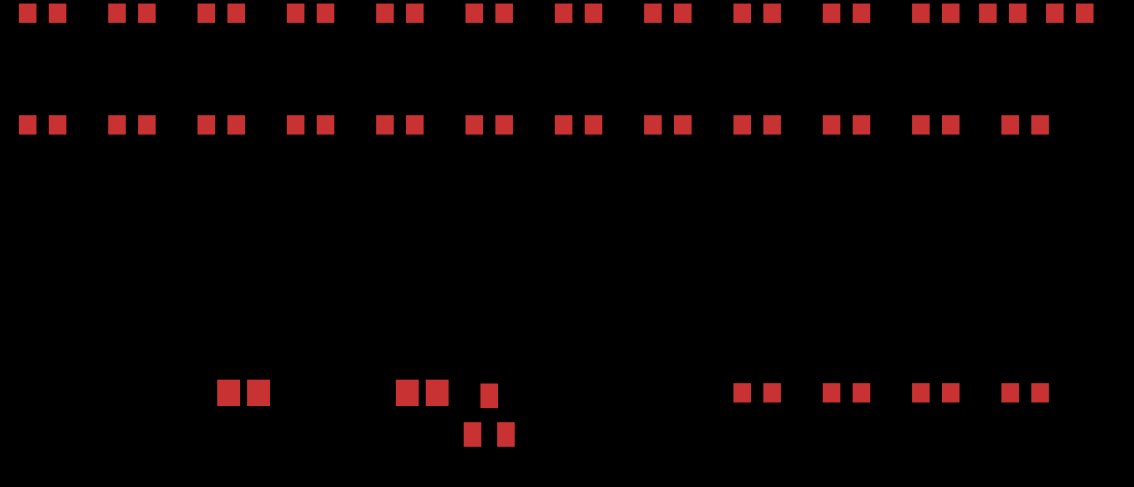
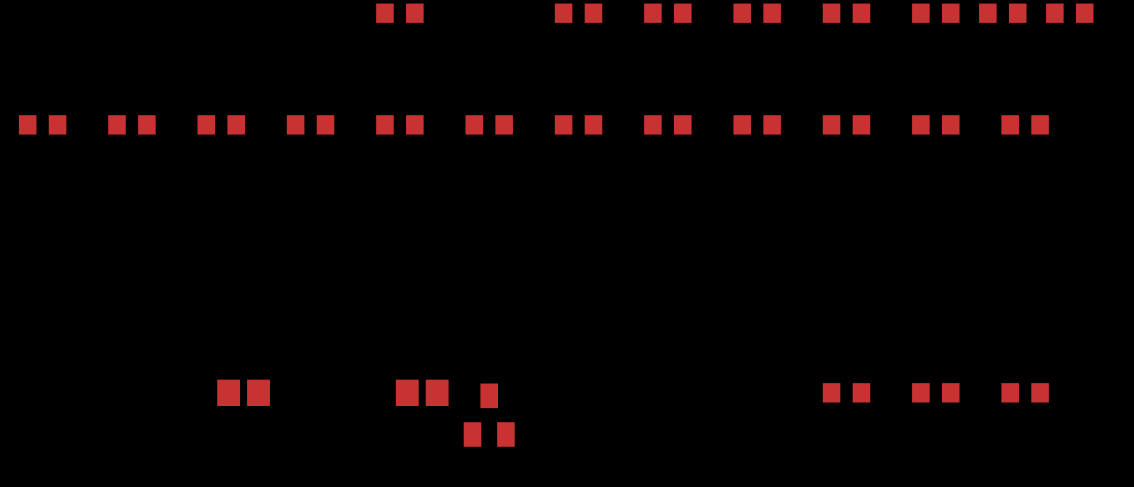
part: (42, 13) -> none
part: (131, 13) -> none
part: (221, 13) -> none
part: (310, 13) -> none
part: (489, 13) -> none
part: (757, 392) -> none

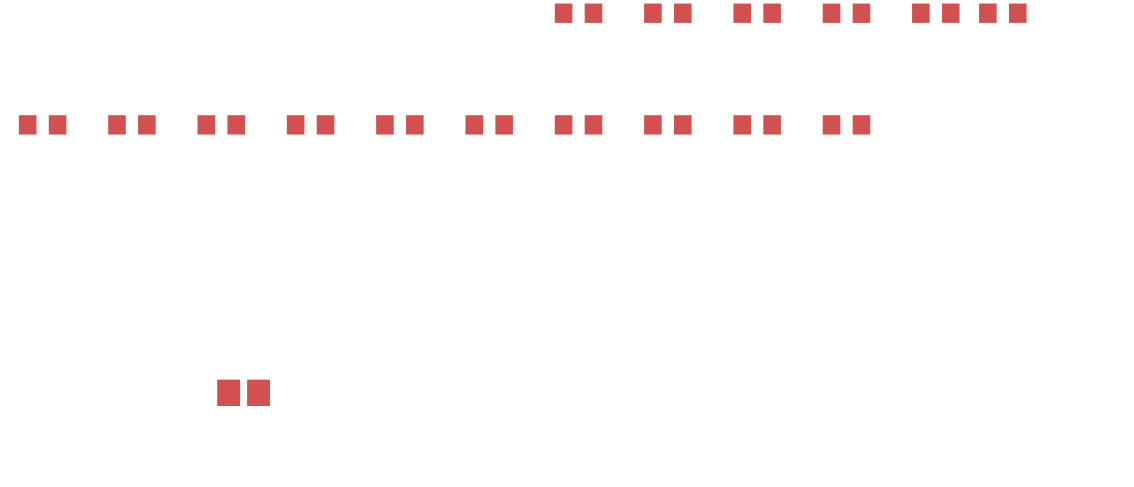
part: (399, 13) -> none
part: (1069, 13) -> none
part: (935, 124) -> none
part: (1025, 124) -> none
part: (422, 392) -> none
part: (846, 392) -> none
part: (935, 392) -> none
part: (1025, 392) -> none
part: (489, 415) -> none

